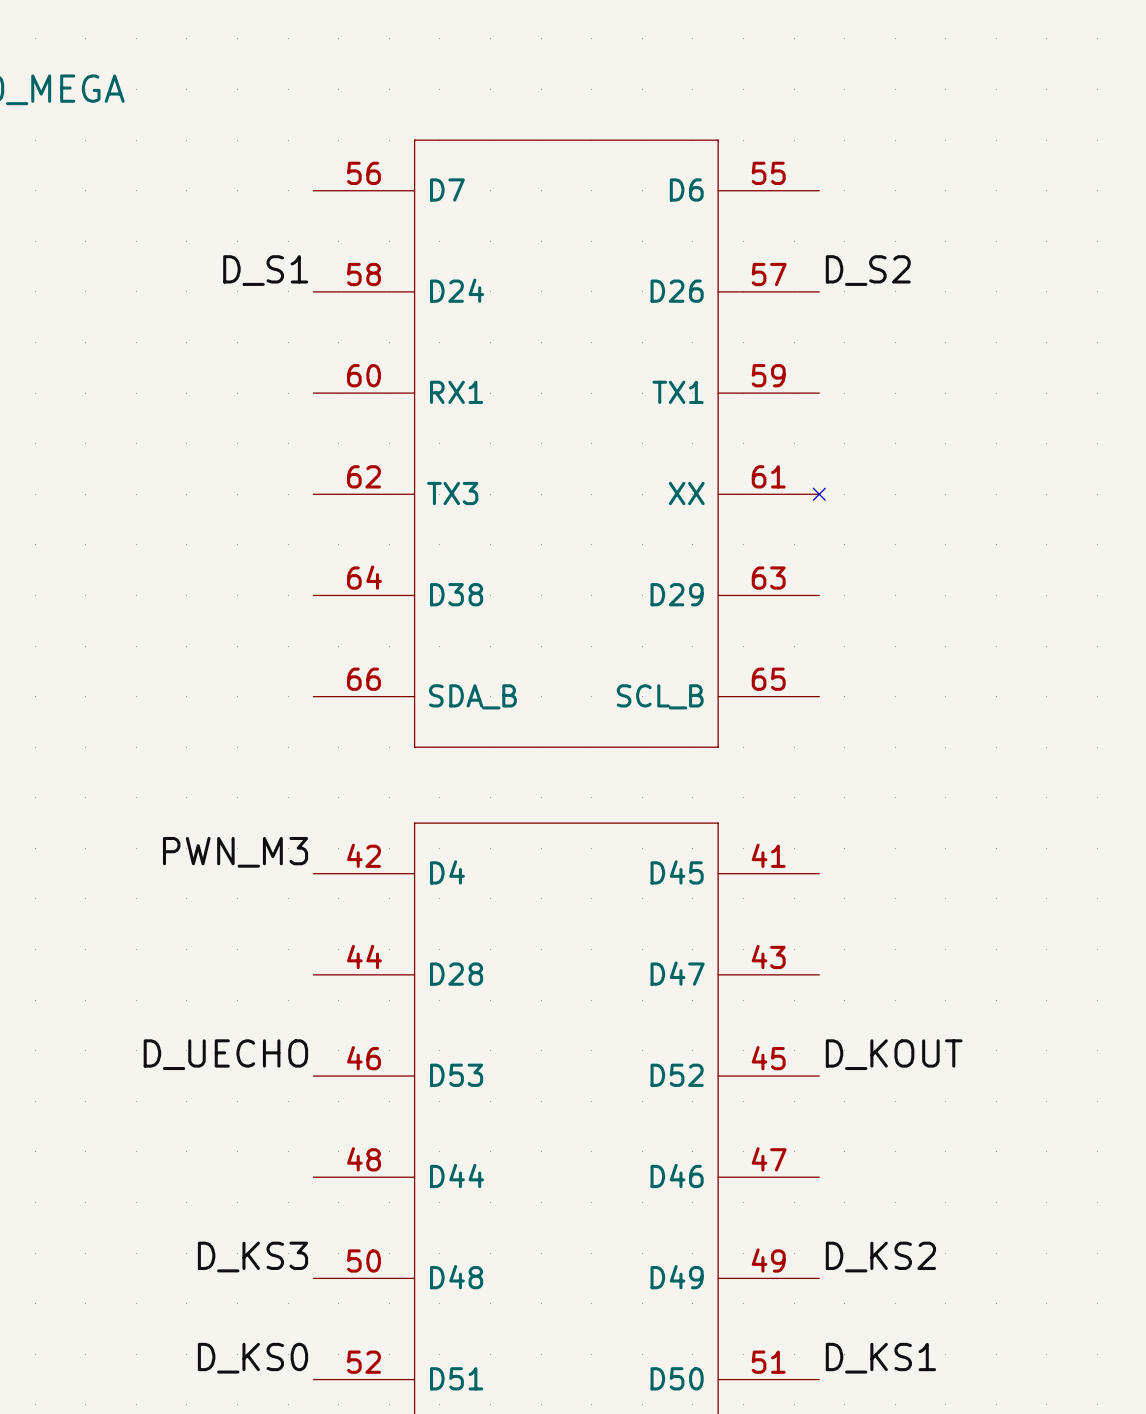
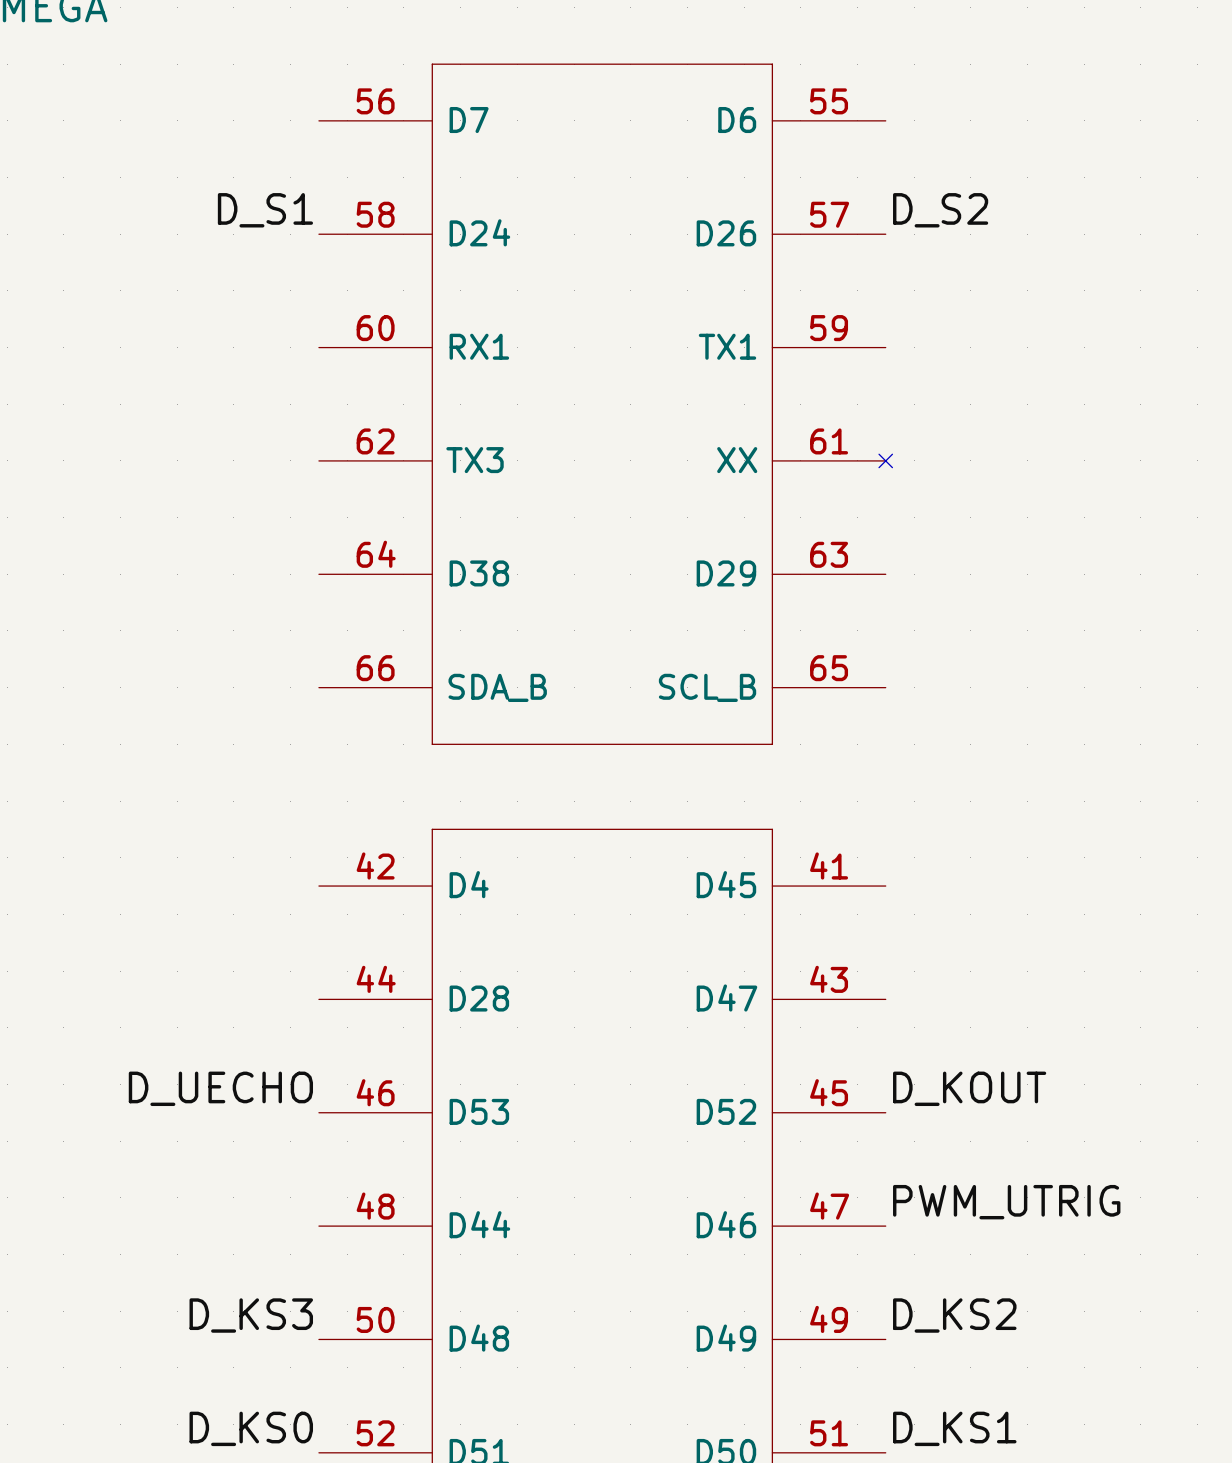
label: PWN_M3 (235, 852) -> none
label: none -> PWM_UTRIG (1006, 1202)

